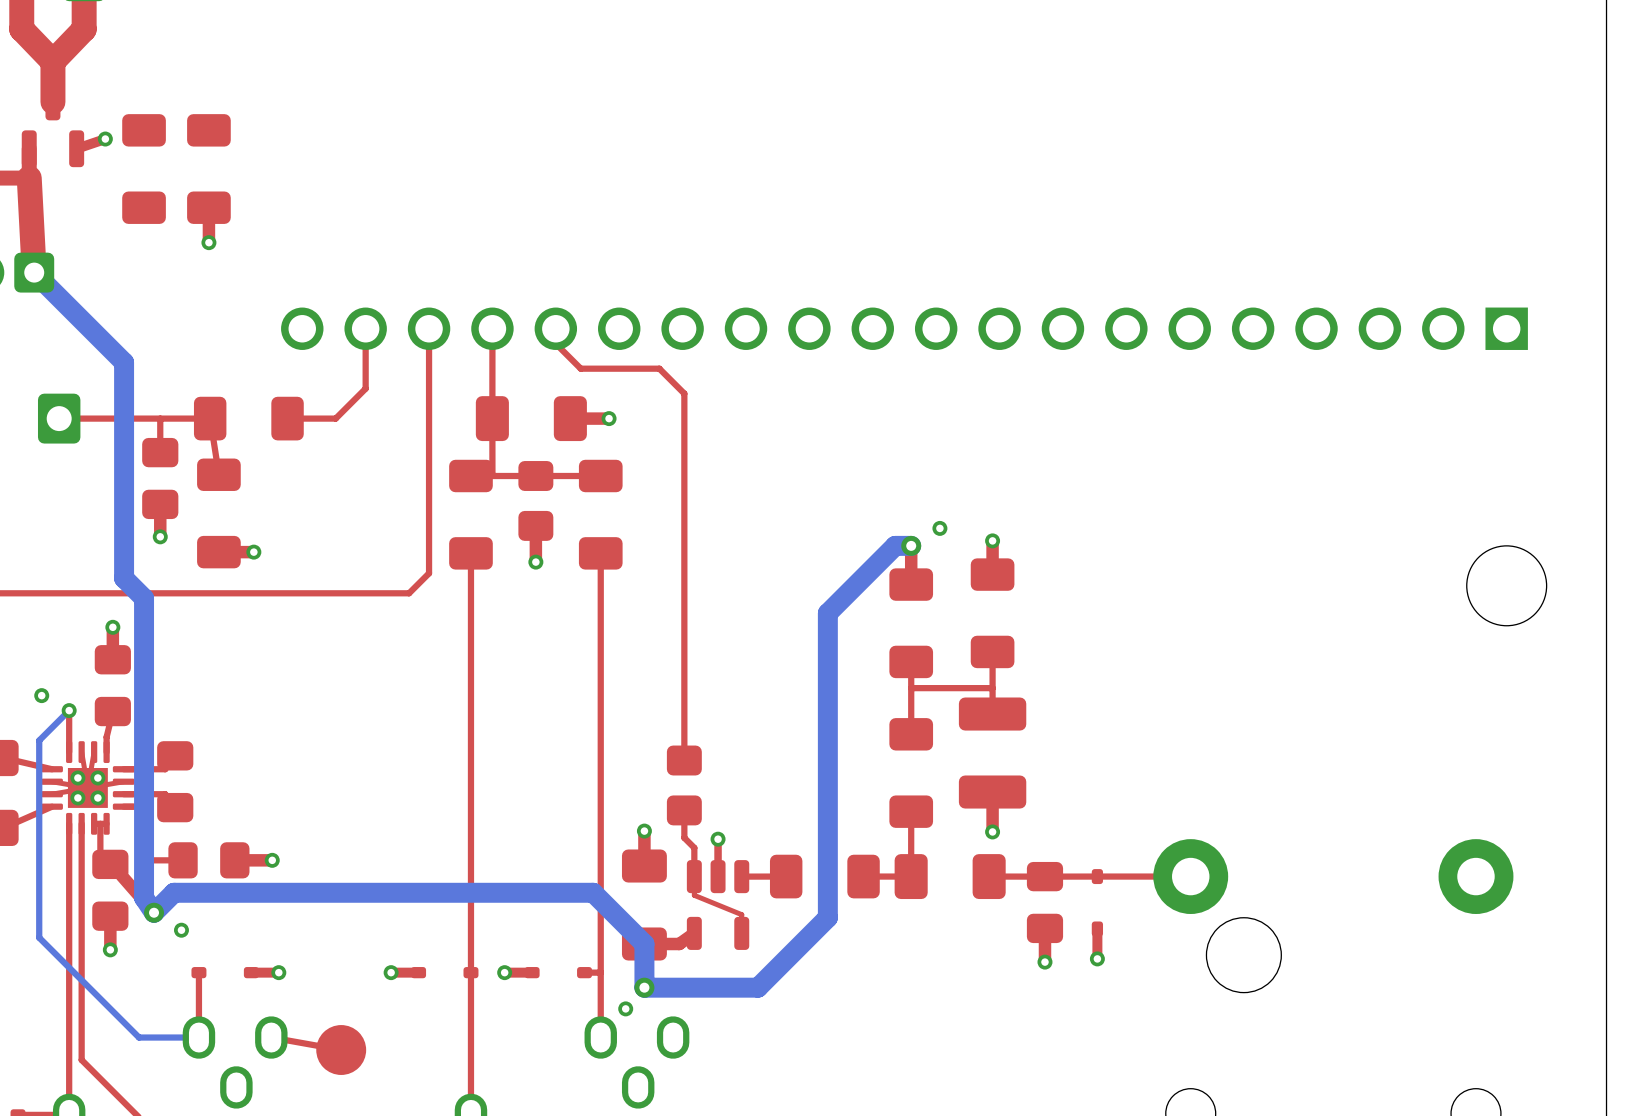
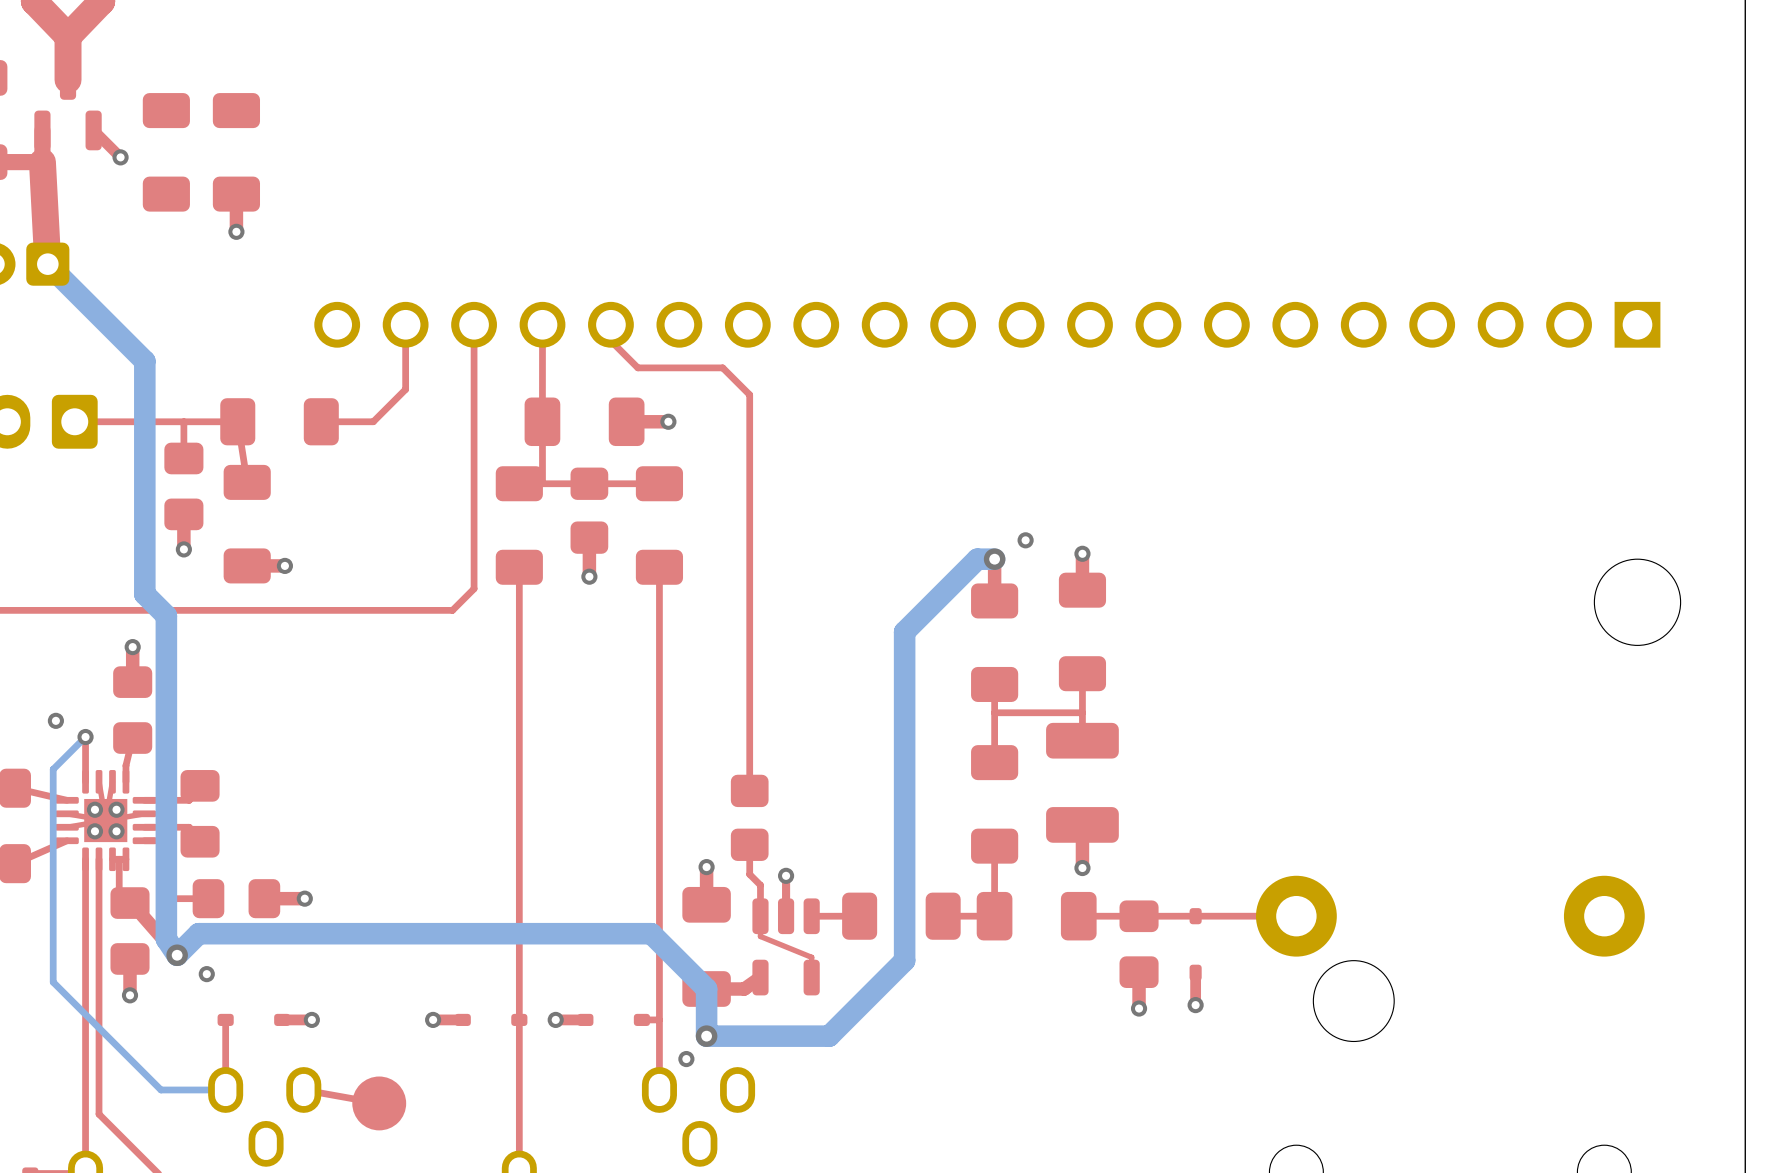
top track: (105, 139) (76, 148) -> (120, 157) (93, 130)
via position: (105, 139) -> (120, 157)

